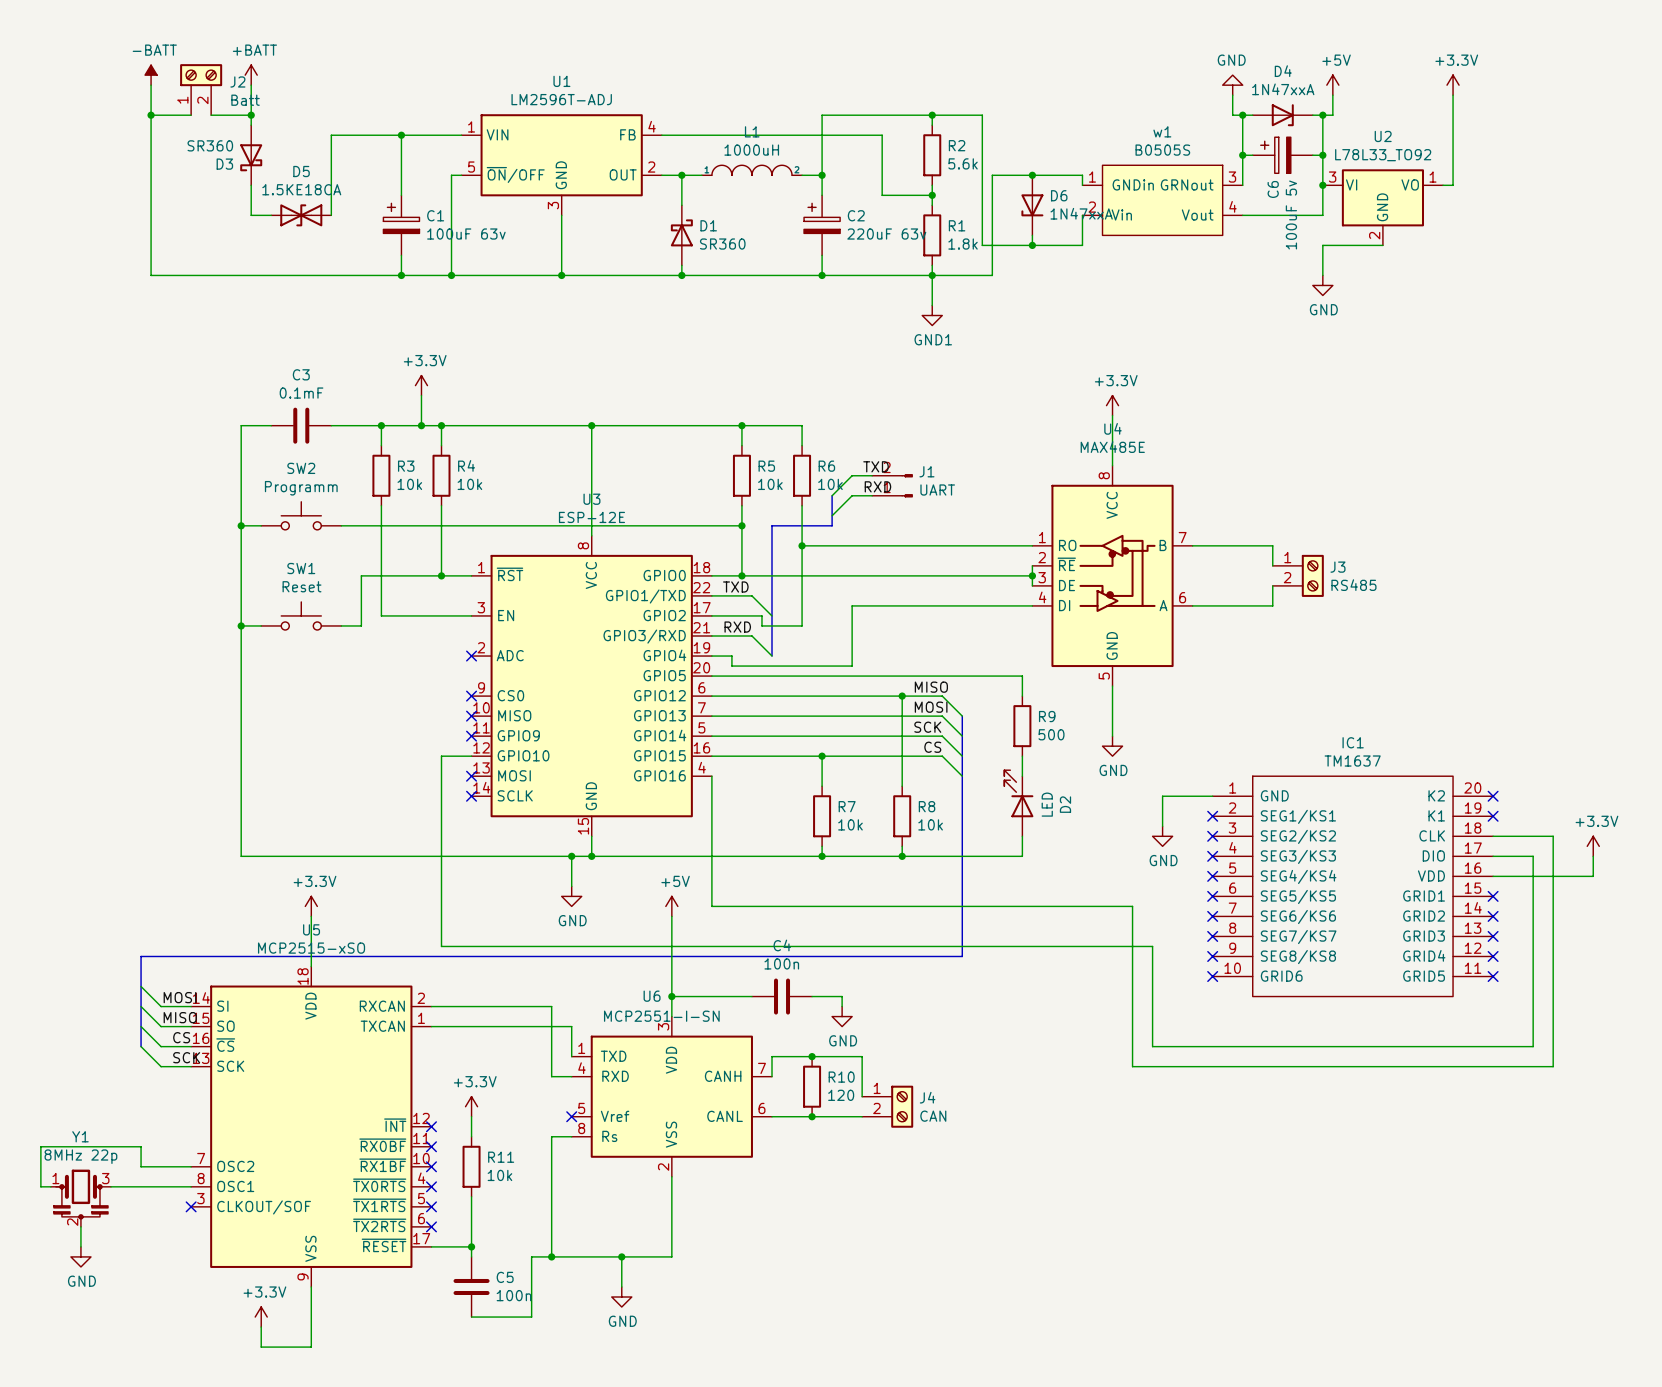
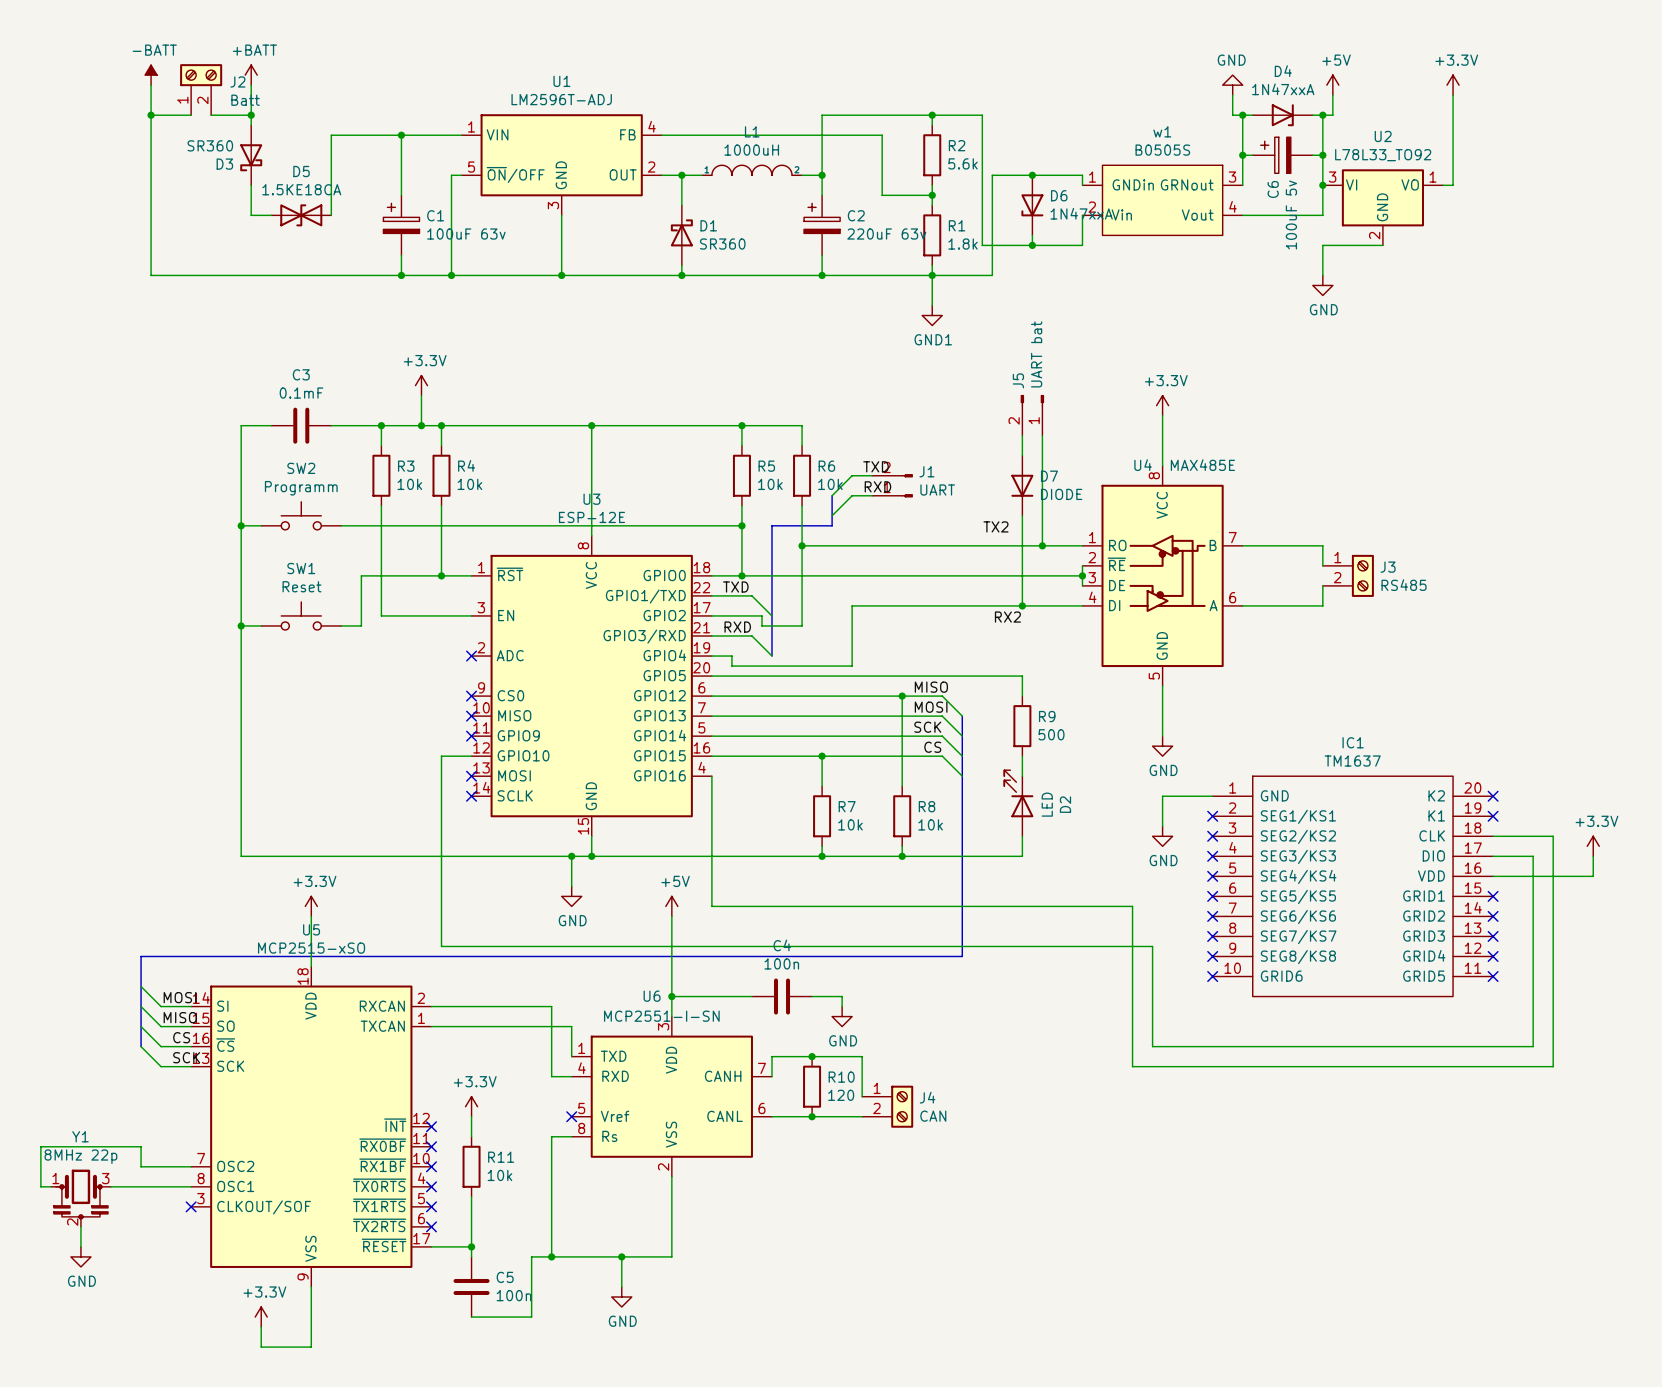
power symbol position: +3.3V (1112, 405) -> +3.3V (1162, 405)
J5: none -> UART bat (1032, 415)
wire: (1112, 415) (1112, 465) -> (1162, 415) (1162, 465)
U4 name position: U4 (1112, 428) -> U4 (1143, 465)
wire: none -> (1022, 435) (1022, 455)
wire: none -> (1042, 435) (1042, 545)
U4 value position: MAX485E (1112, 447) -> MAX485E (1202, 465)
D7: none -> DIODE (1022, 485)
wire: none -> (1022, 515) (1022, 605)
label: none -> TX2 (995, 526)
junction: none -> (1042, 545)
wire: (1272, 545) (1272, 565) -> (1272, 545) (1322, 545) (1322, 565)
junction: (1032, 575) -> none
junction: none -> (1082, 575)
U4 position: (1112, 575) -> (1162, 575)
J3 position: (1298, 575) -> (1348, 575)
wire: (1272, 585) (1272, 605) -> (1322, 585) (1322, 605) (1272, 605)
junction: none -> (1022, 605)
label: none -> RX2 (1007, 617)
wire: (1112, 686) (1112, 736) -> (1162, 686) (1162, 736)
power symbol position: GND (1112, 746) -> GND (1162, 746)

